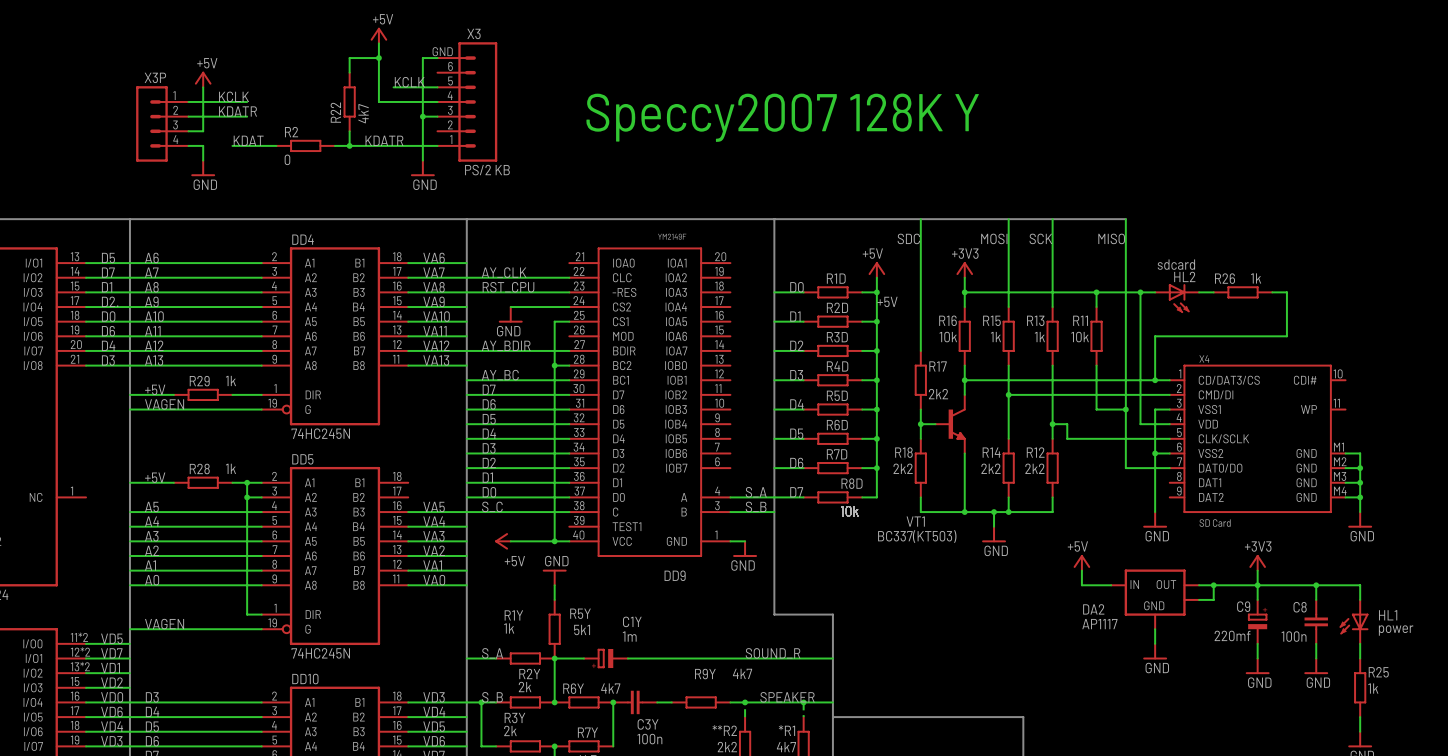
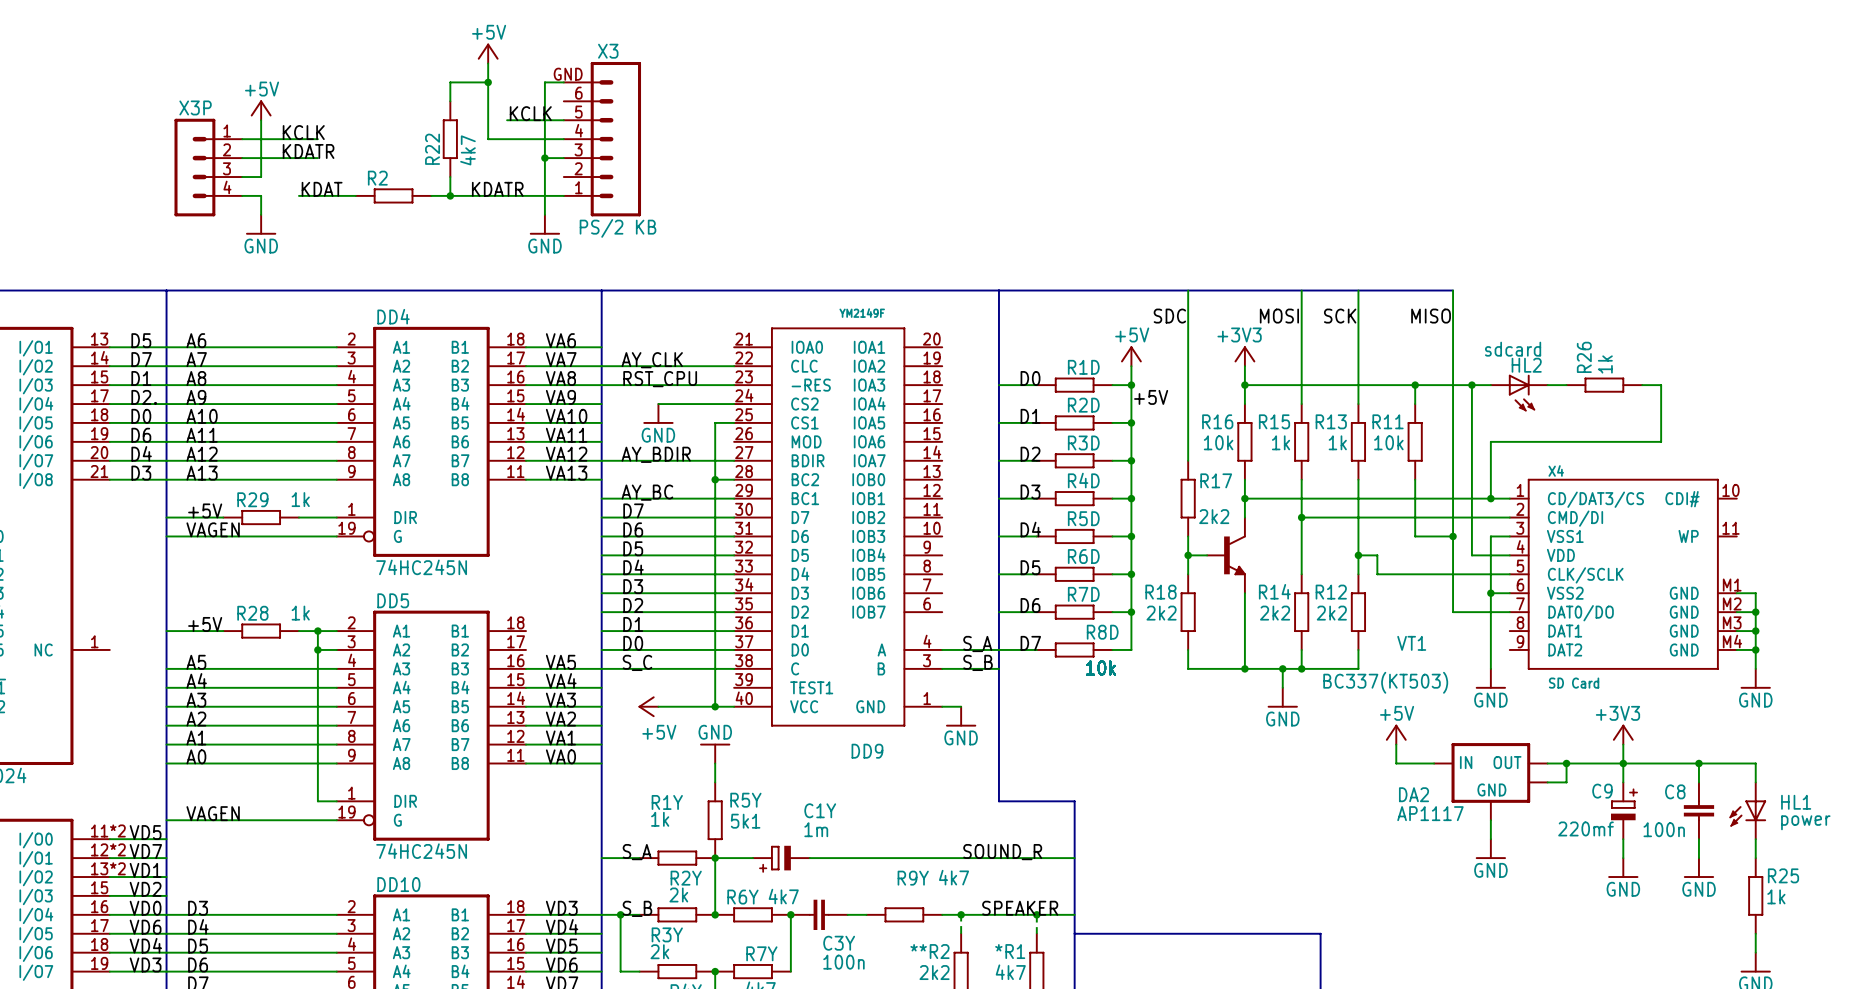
text: Speccy2007 128K Y (782, 117) -> none
R2 value: 0 (287, 159) -> none
R26 name rotation: 0° (1225, 278) -> 90° counterclockwise (1584, 357)
R26 value rotation: 0° (1256, 278) -> 90° counterclockwise (1605, 364)
VT1 name position: VT1 (915, 521) -> VT1 (1411, 643)
VT1 value position: BC337(KT503) (917, 536) -> BC337(KT503) (1385, 682)

